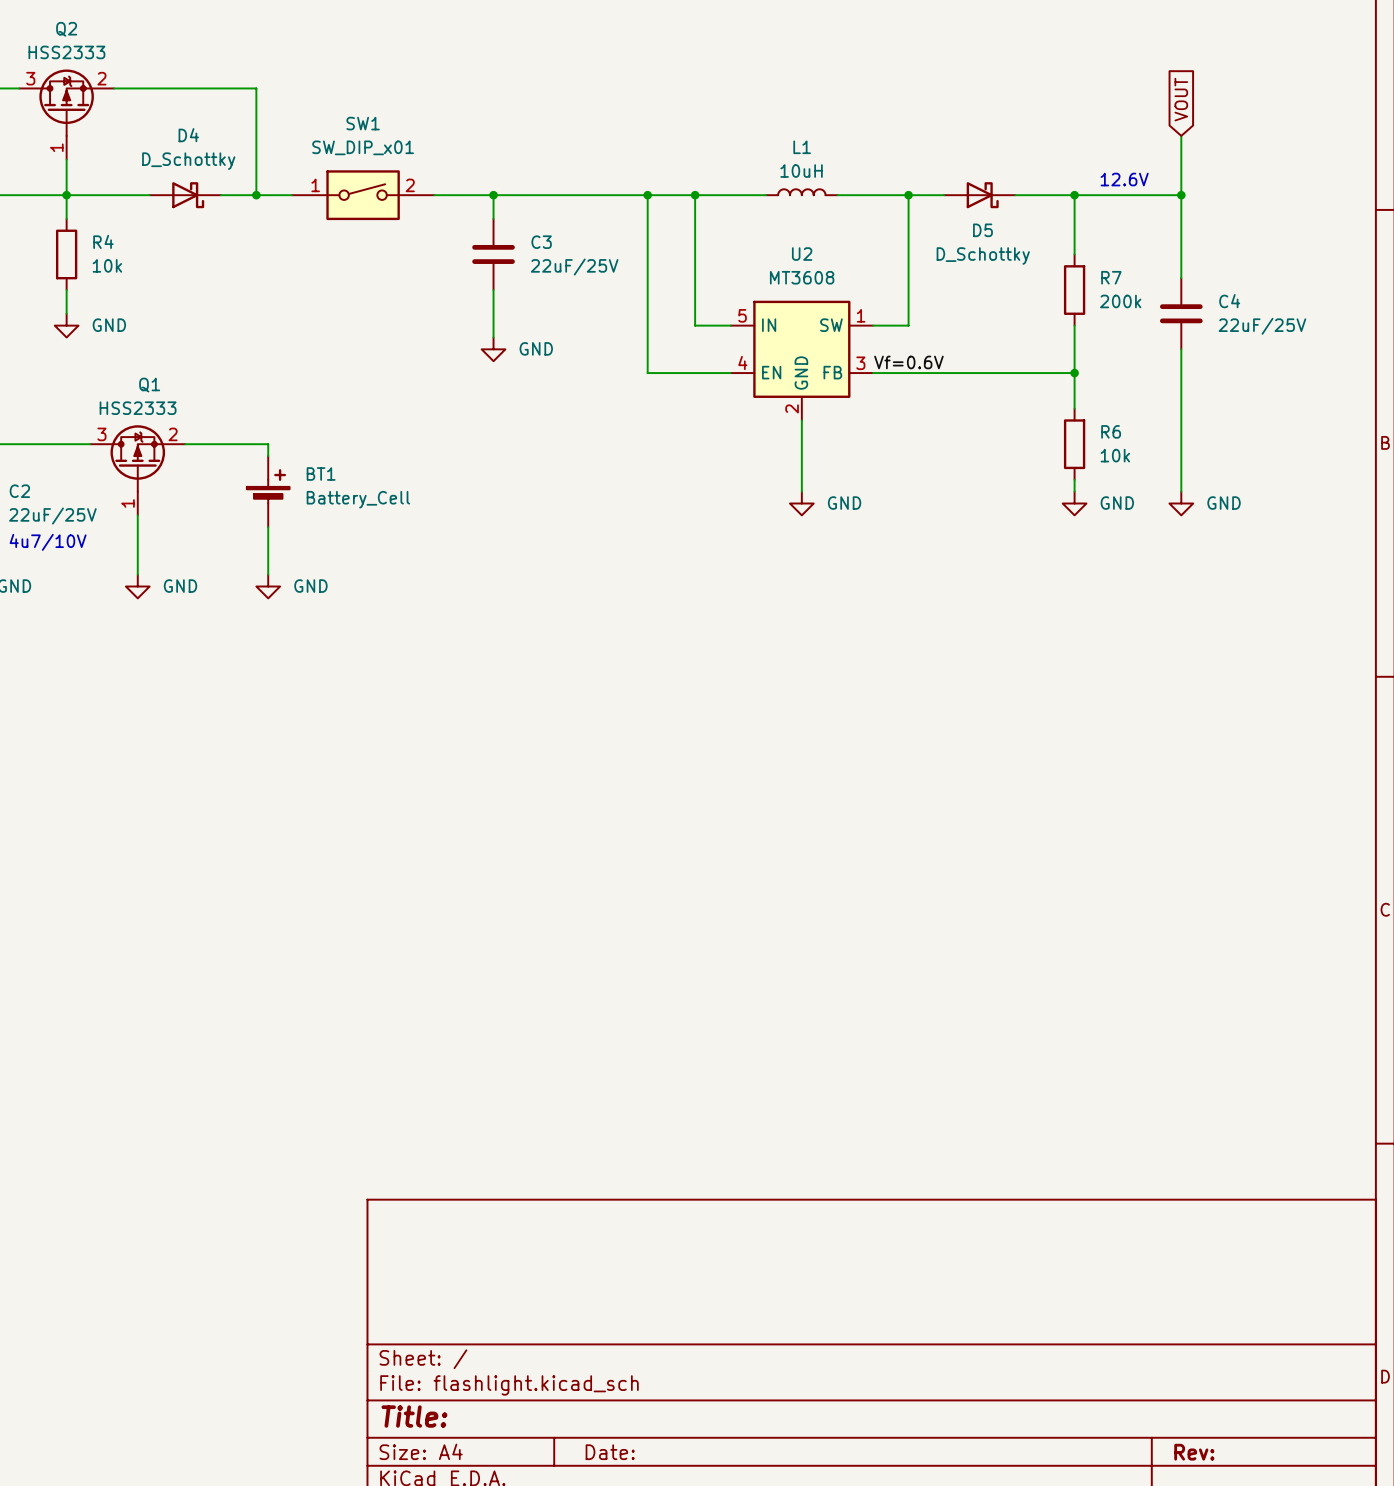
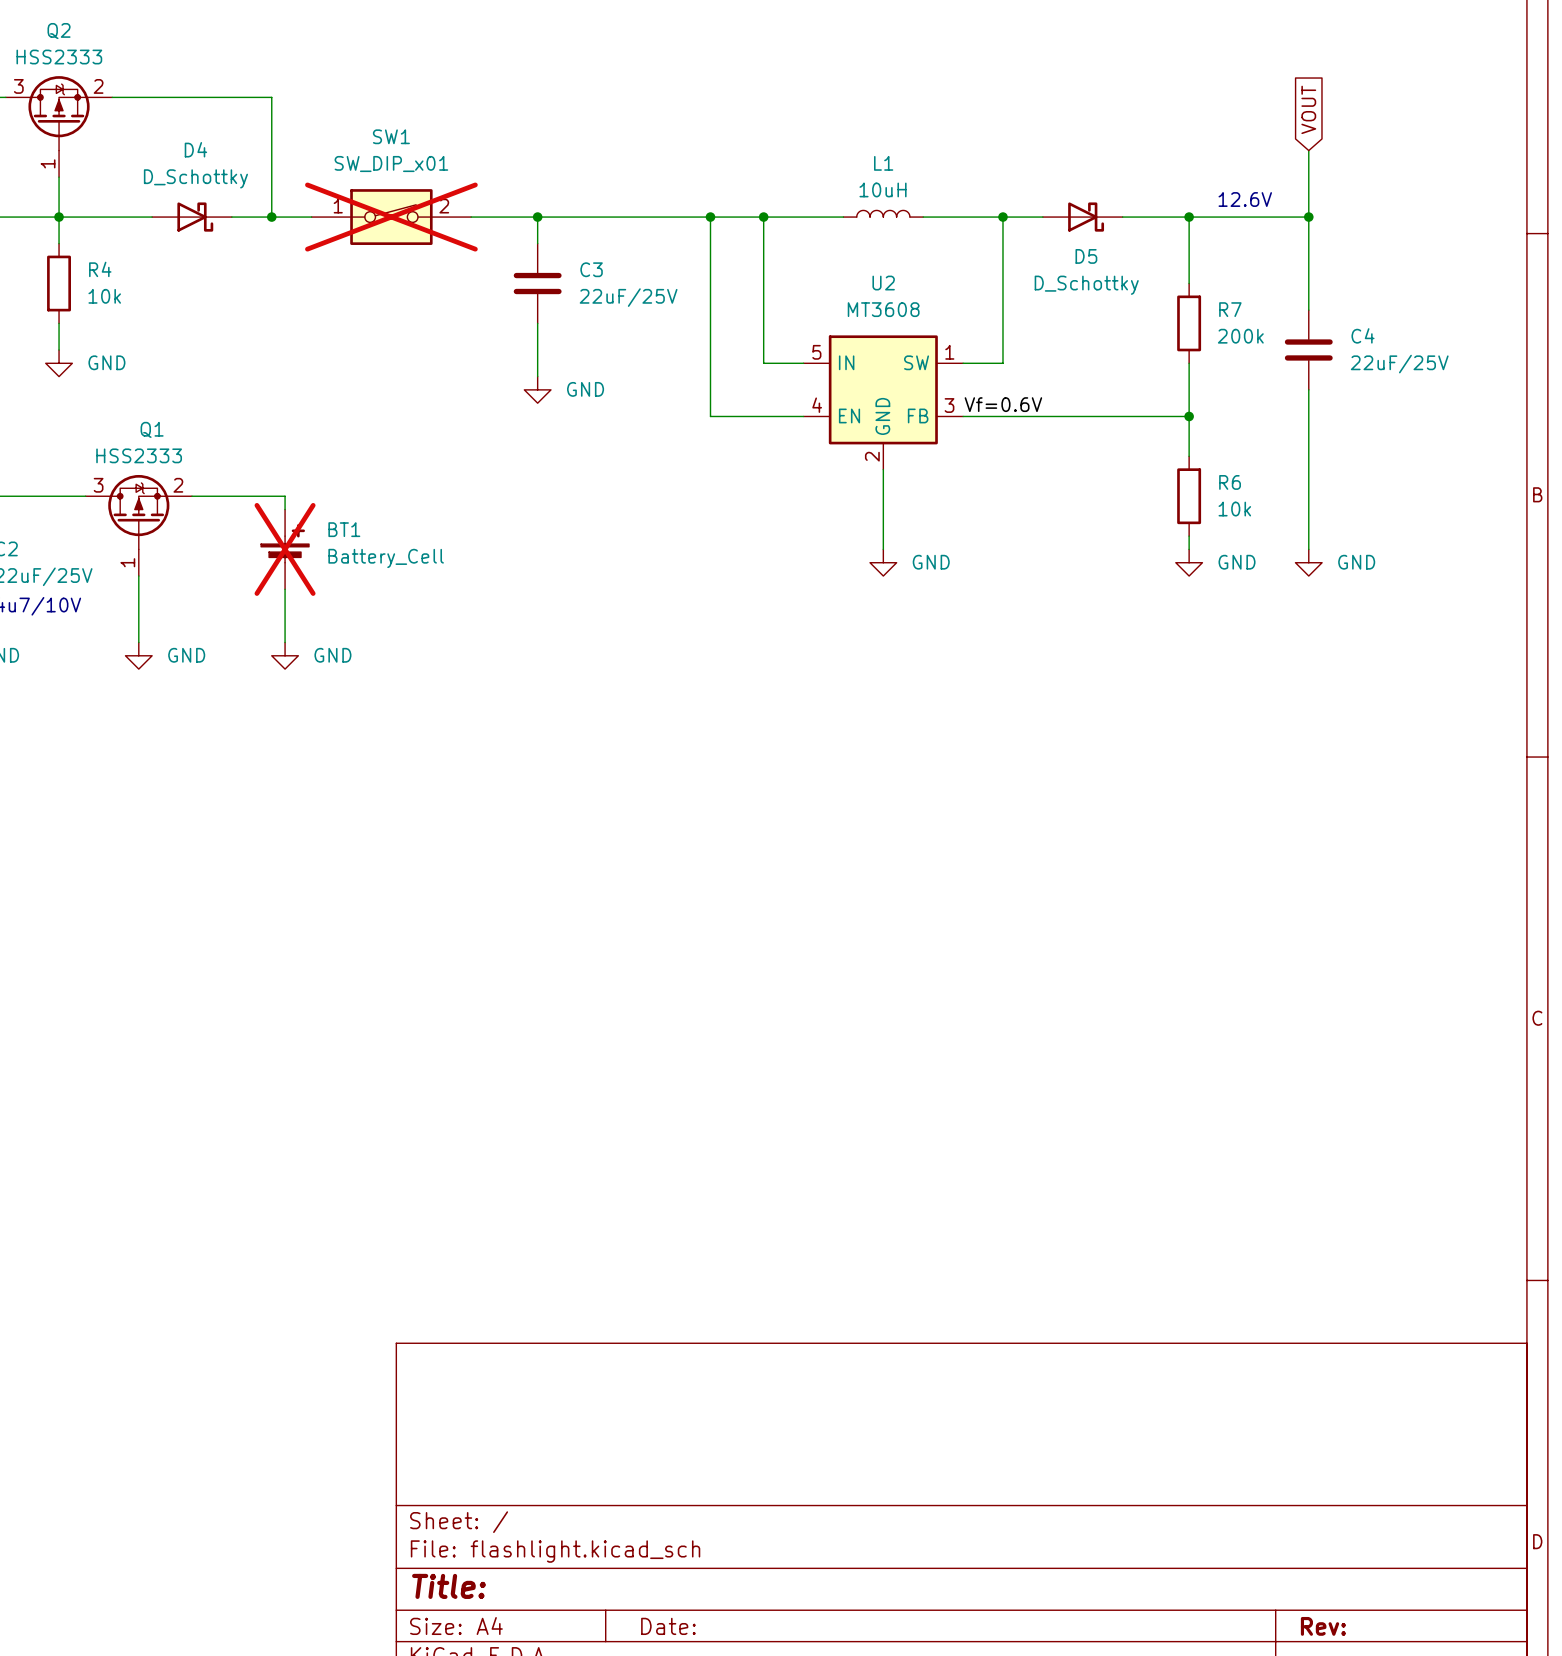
SW1 do-not-place cross: none -> (391, 217)
BT1 do-not-place cross: none -> (285, 549)

